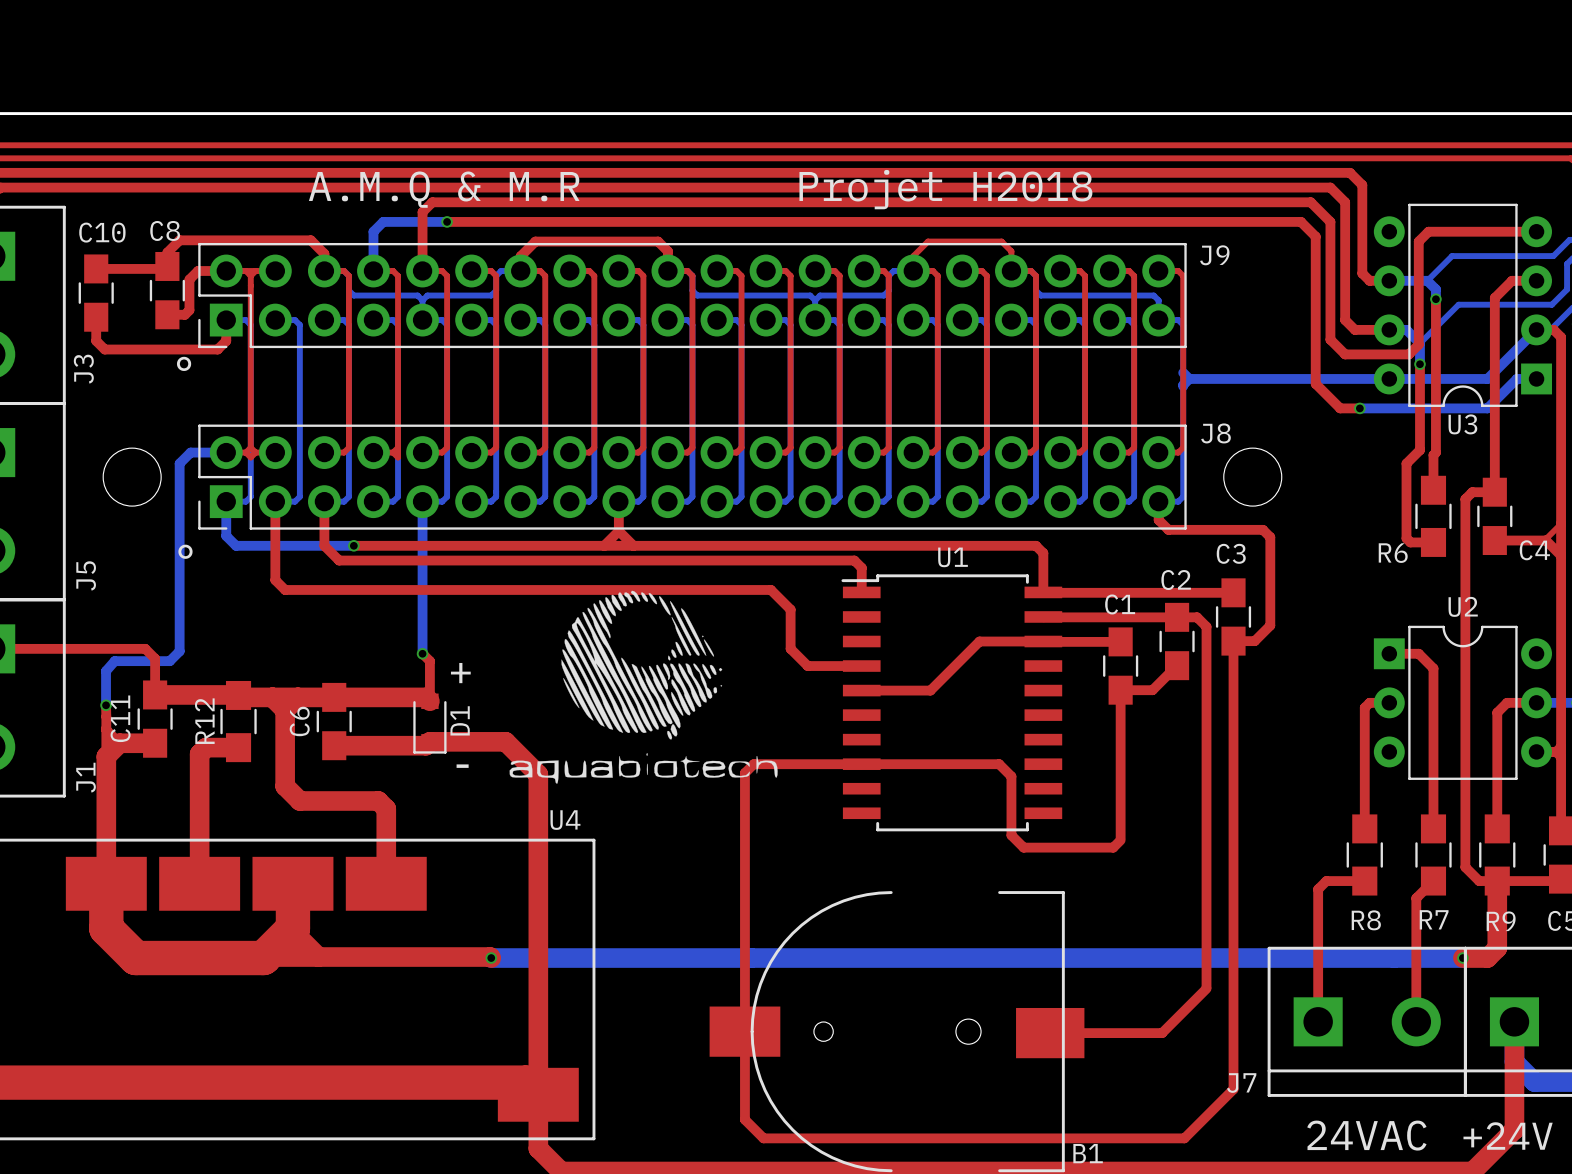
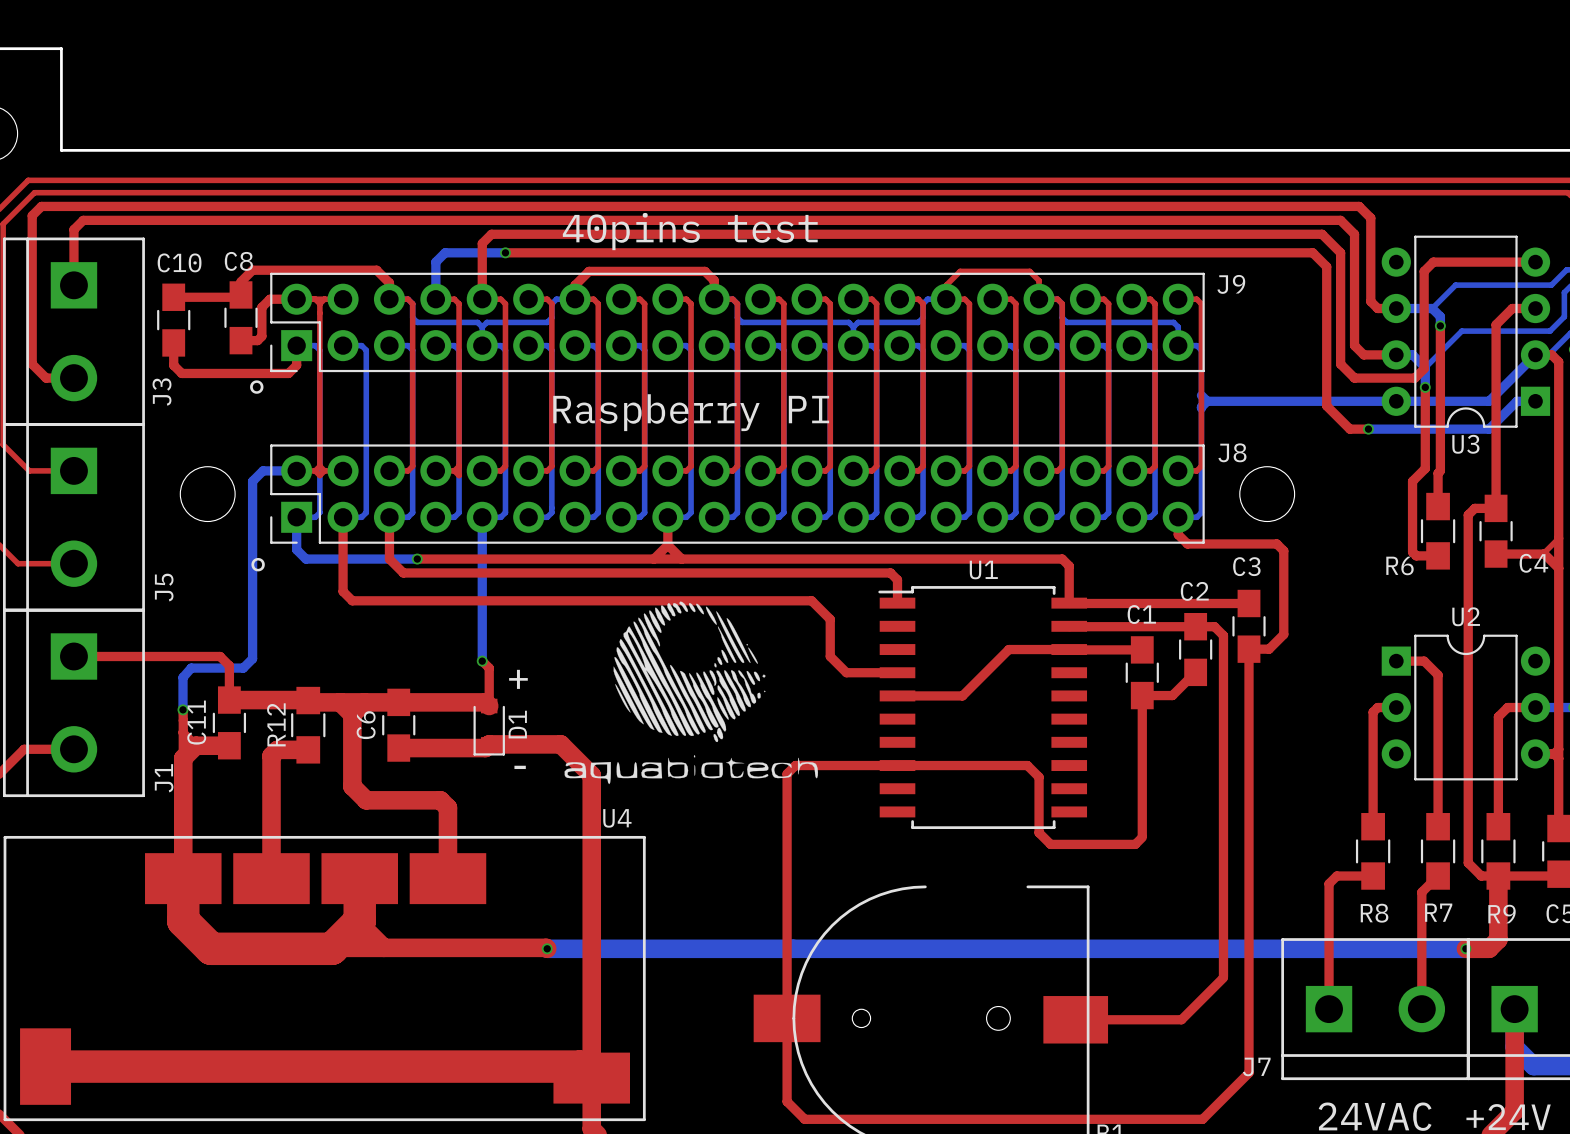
text: A.M.Q & M.R (444, 189) -> none
text: Projet H2018 (945, 189) -> none
text: none -> 40pins test (690, 231)
text: none -> Raspberry PI (691, 412)

